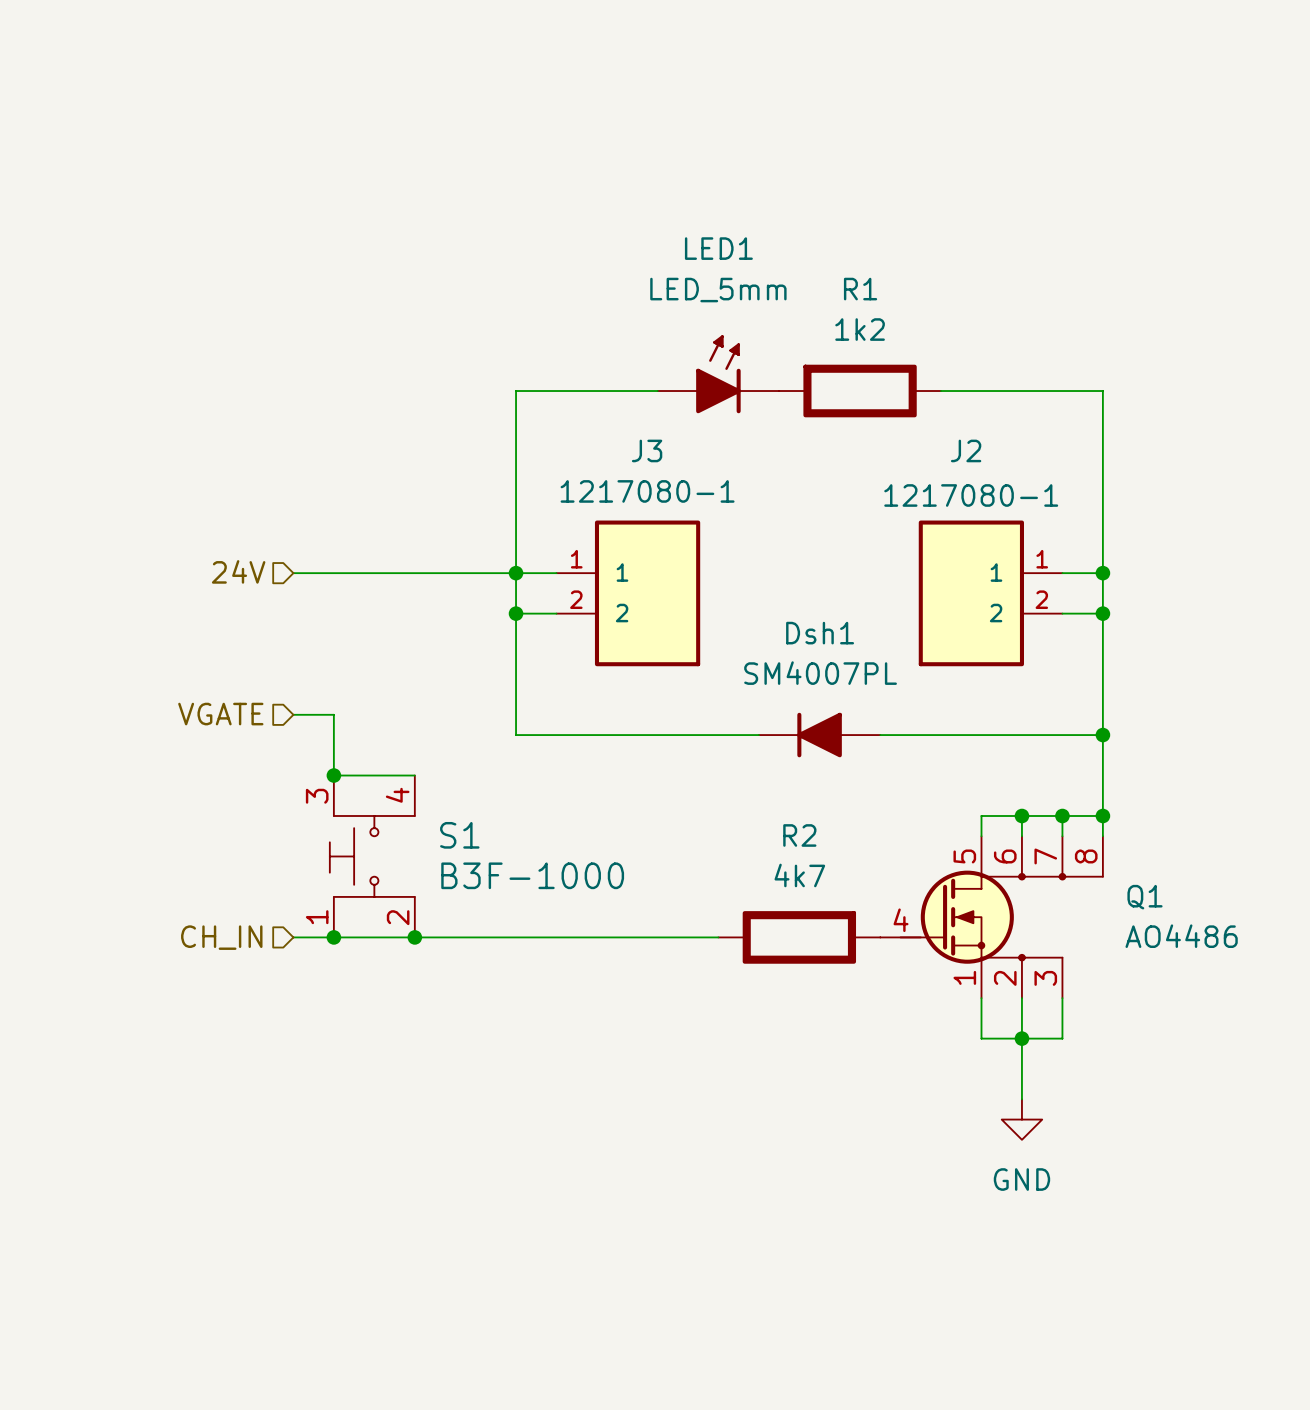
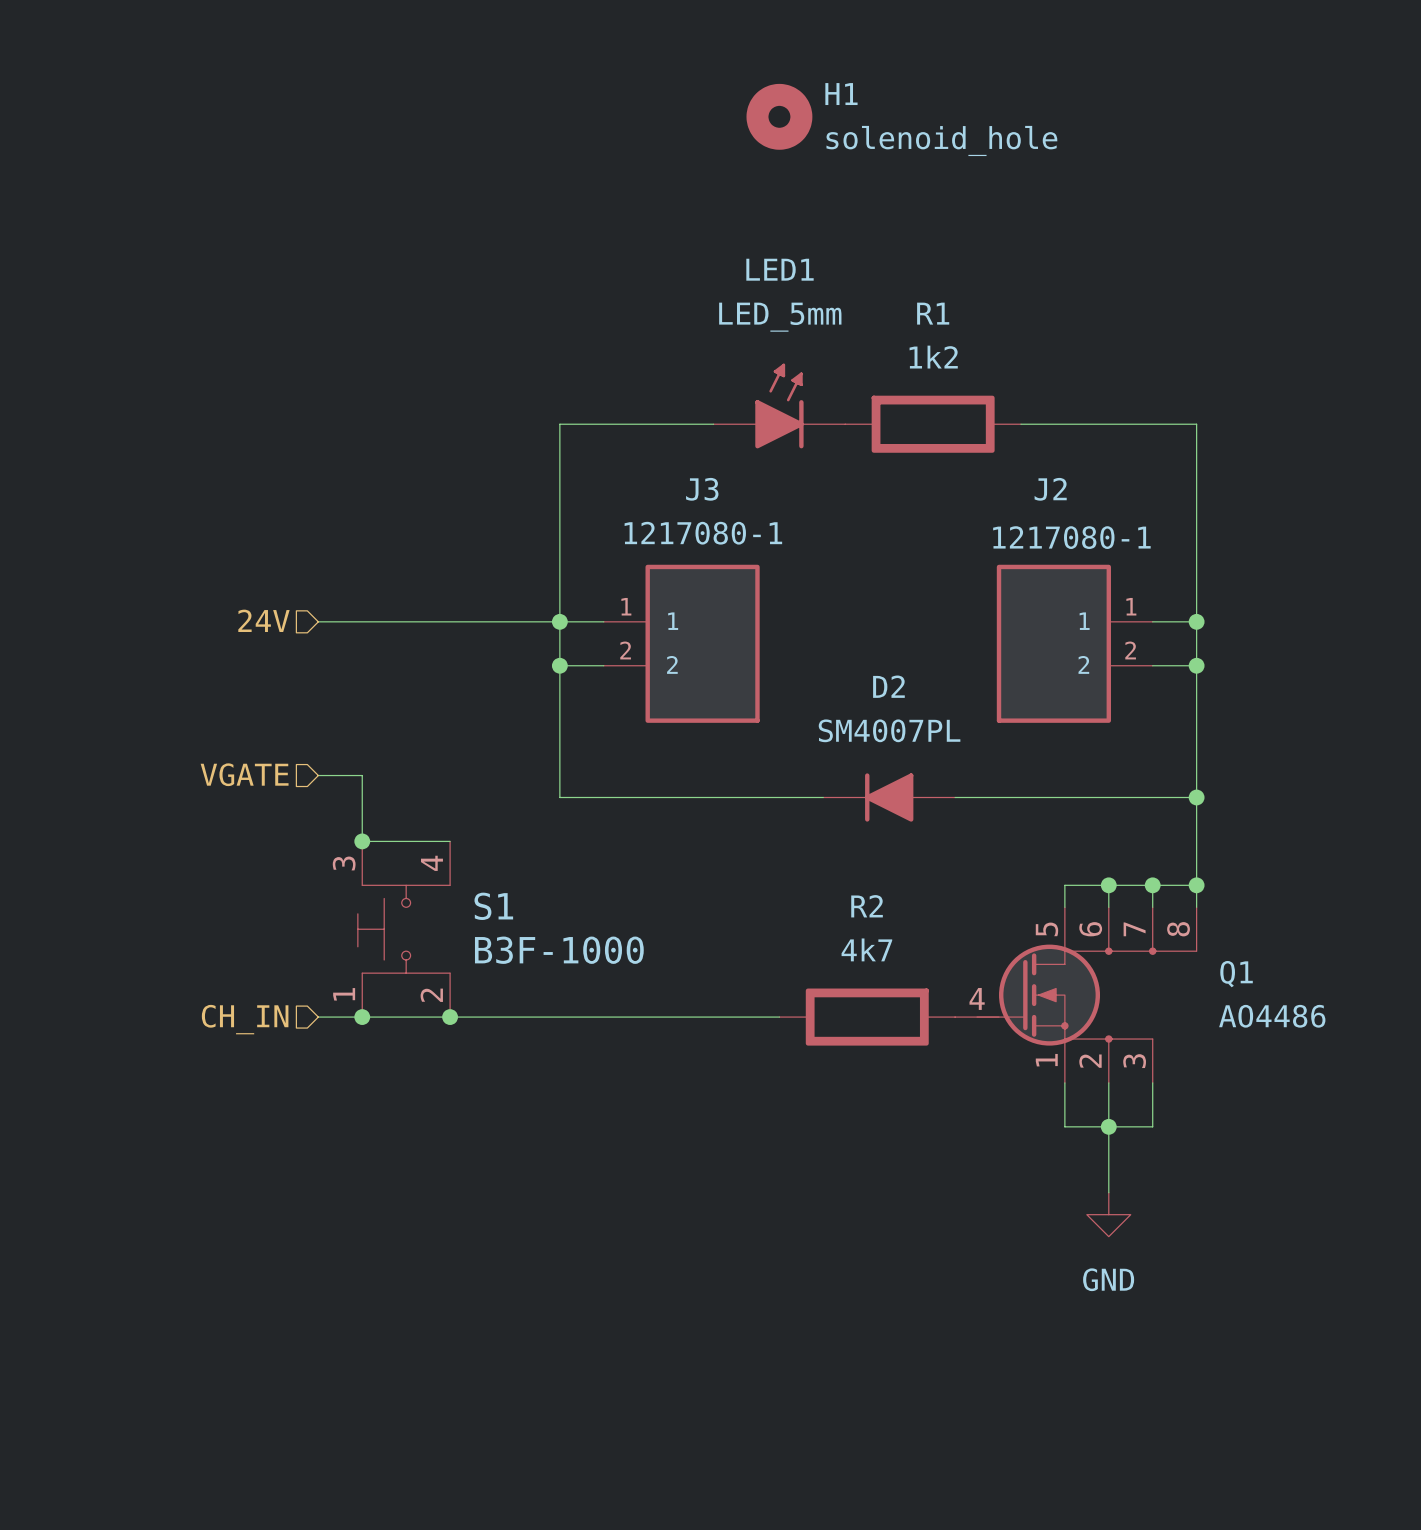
H1: none -> solenoid_hole (779, 116)
Dsh1 name: Dsh1 (820, 633) -> D2 (888, 686)

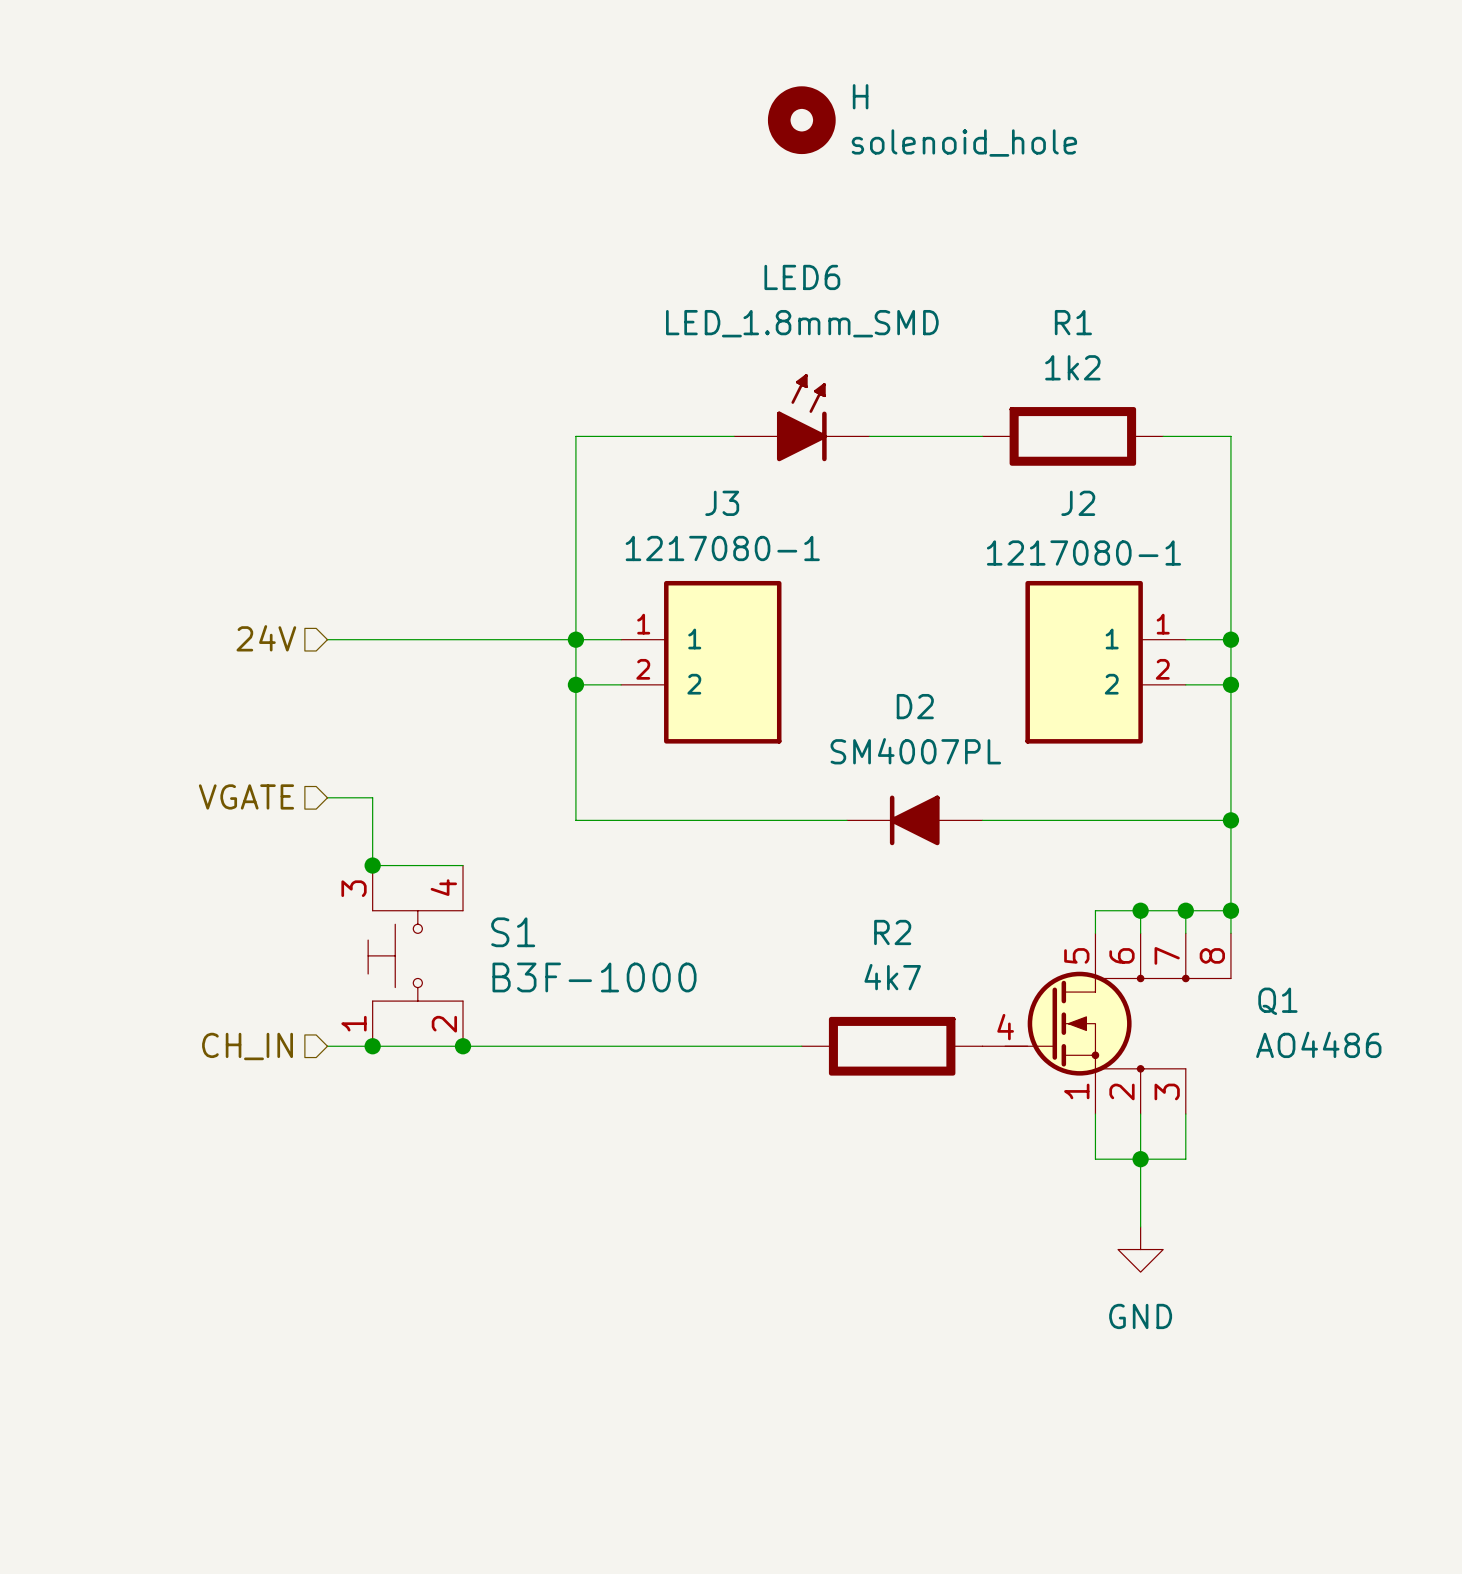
H1 name: H1 (841, 94) -> H (860, 96)
LED1 name: LED1 (780, 269) -> LED6 (802, 277)
LED1 value: LED_5mm (780, 317) -> LED_1.8mm_SMD (802, 323)
R1 position: (933, 424) -> (1072, 436)
wire: (1020, 424) (1130, 424) -> (869, 436) (982, 436)

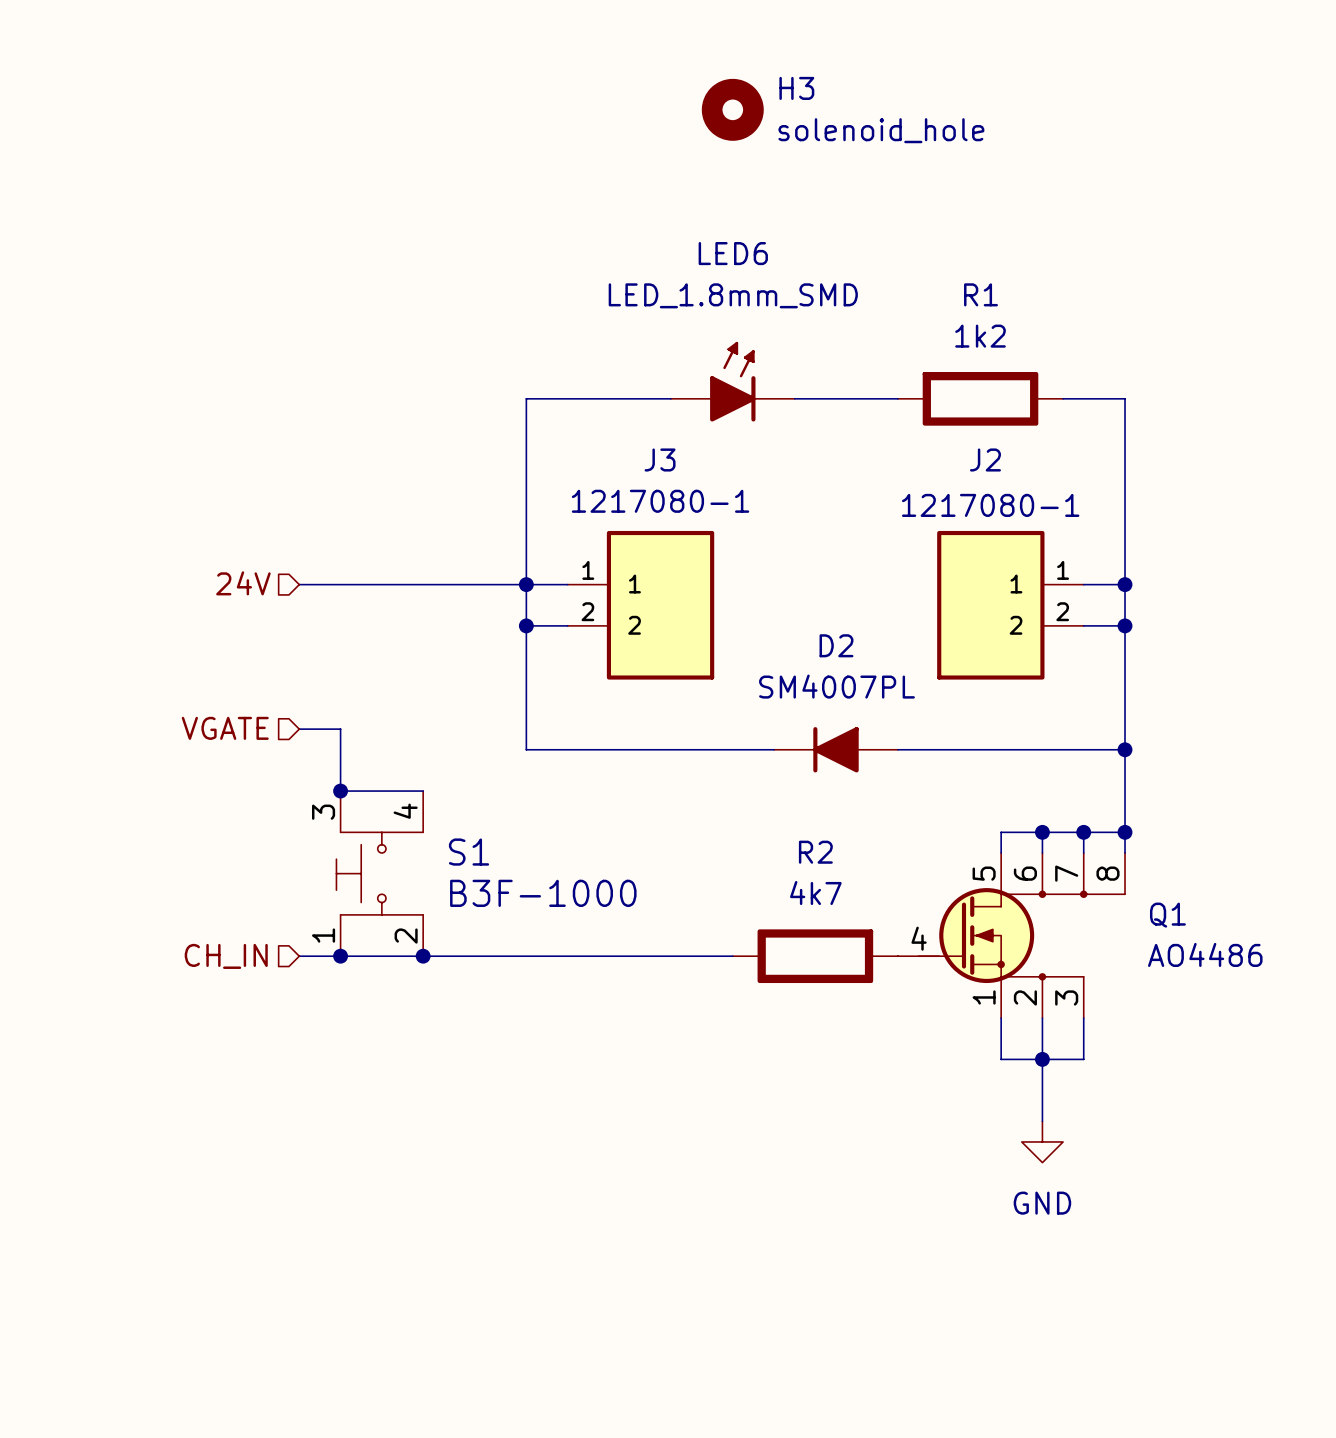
H name: H (860, 96) -> H3 (796, 88)

